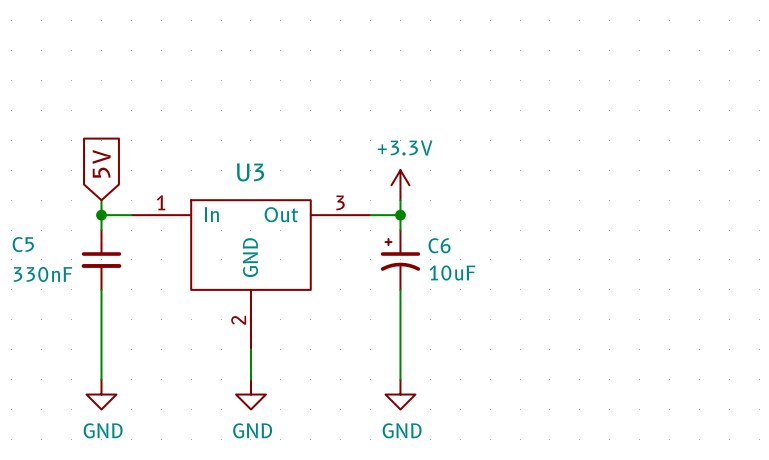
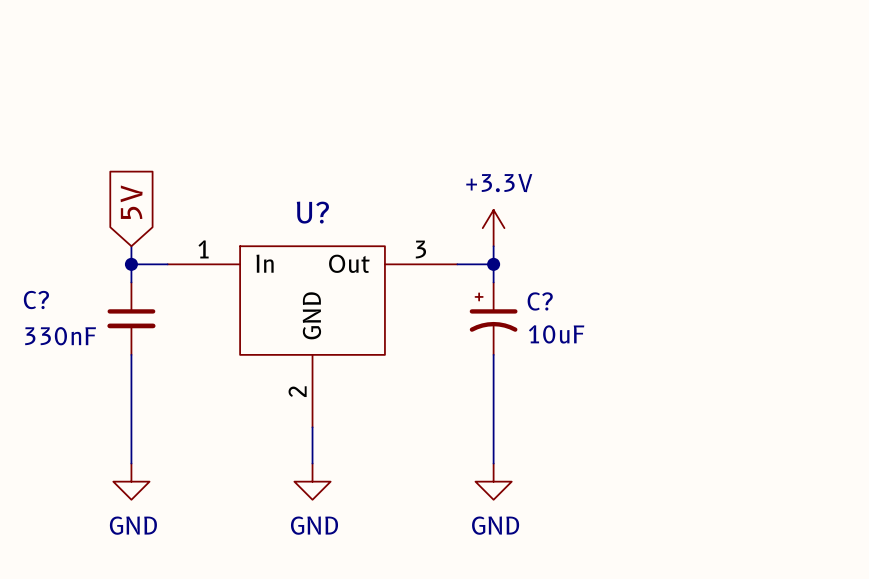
U3 name: U3 (250, 172) -> U? (312, 212)
C5 name: C5 (23, 244) -> C? (36, 300)
C6 name: C6 (439, 245) -> C? (540, 301)

